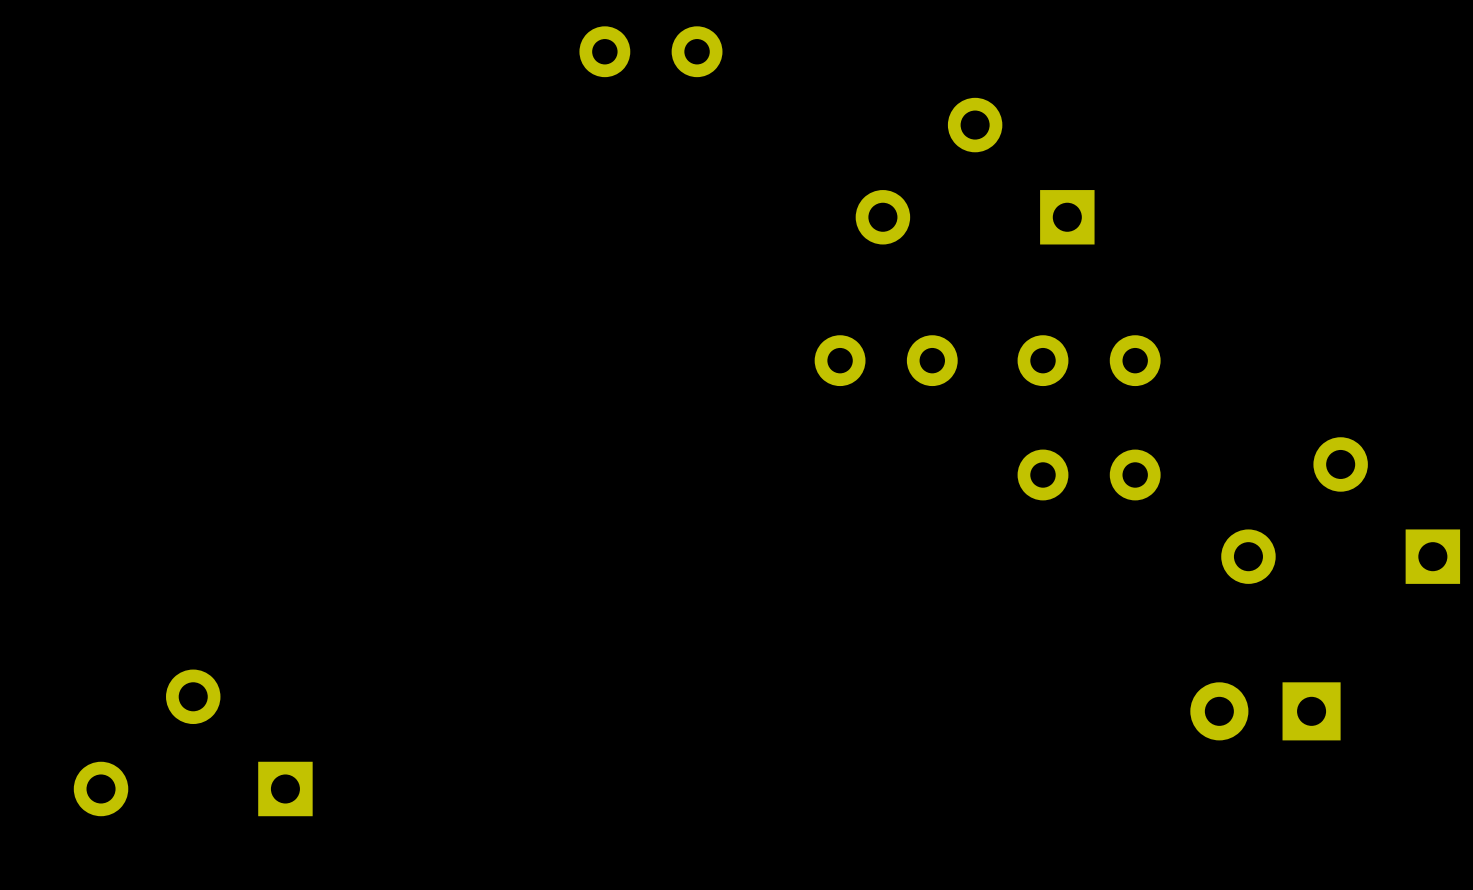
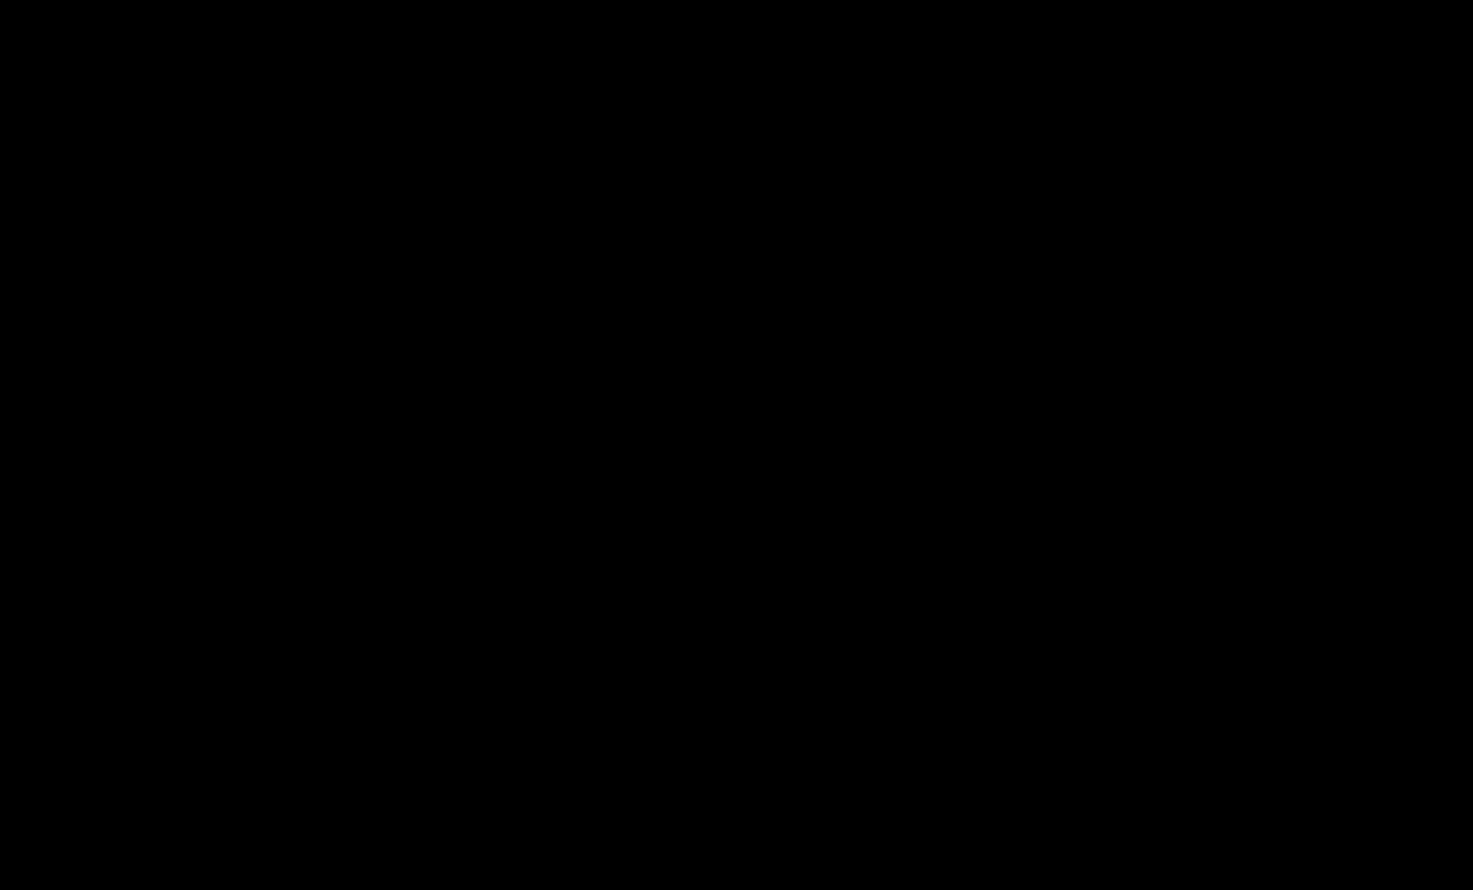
part: (650, 51) -> none
part: (975, 171) -> none
part: (886, 360) -> none
part: (1089, 360) -> none
part: (1089, 474) -> none
part: (1340, 510) -> none
part: (1265, 711) -> none
part: (193, 742) -> none

